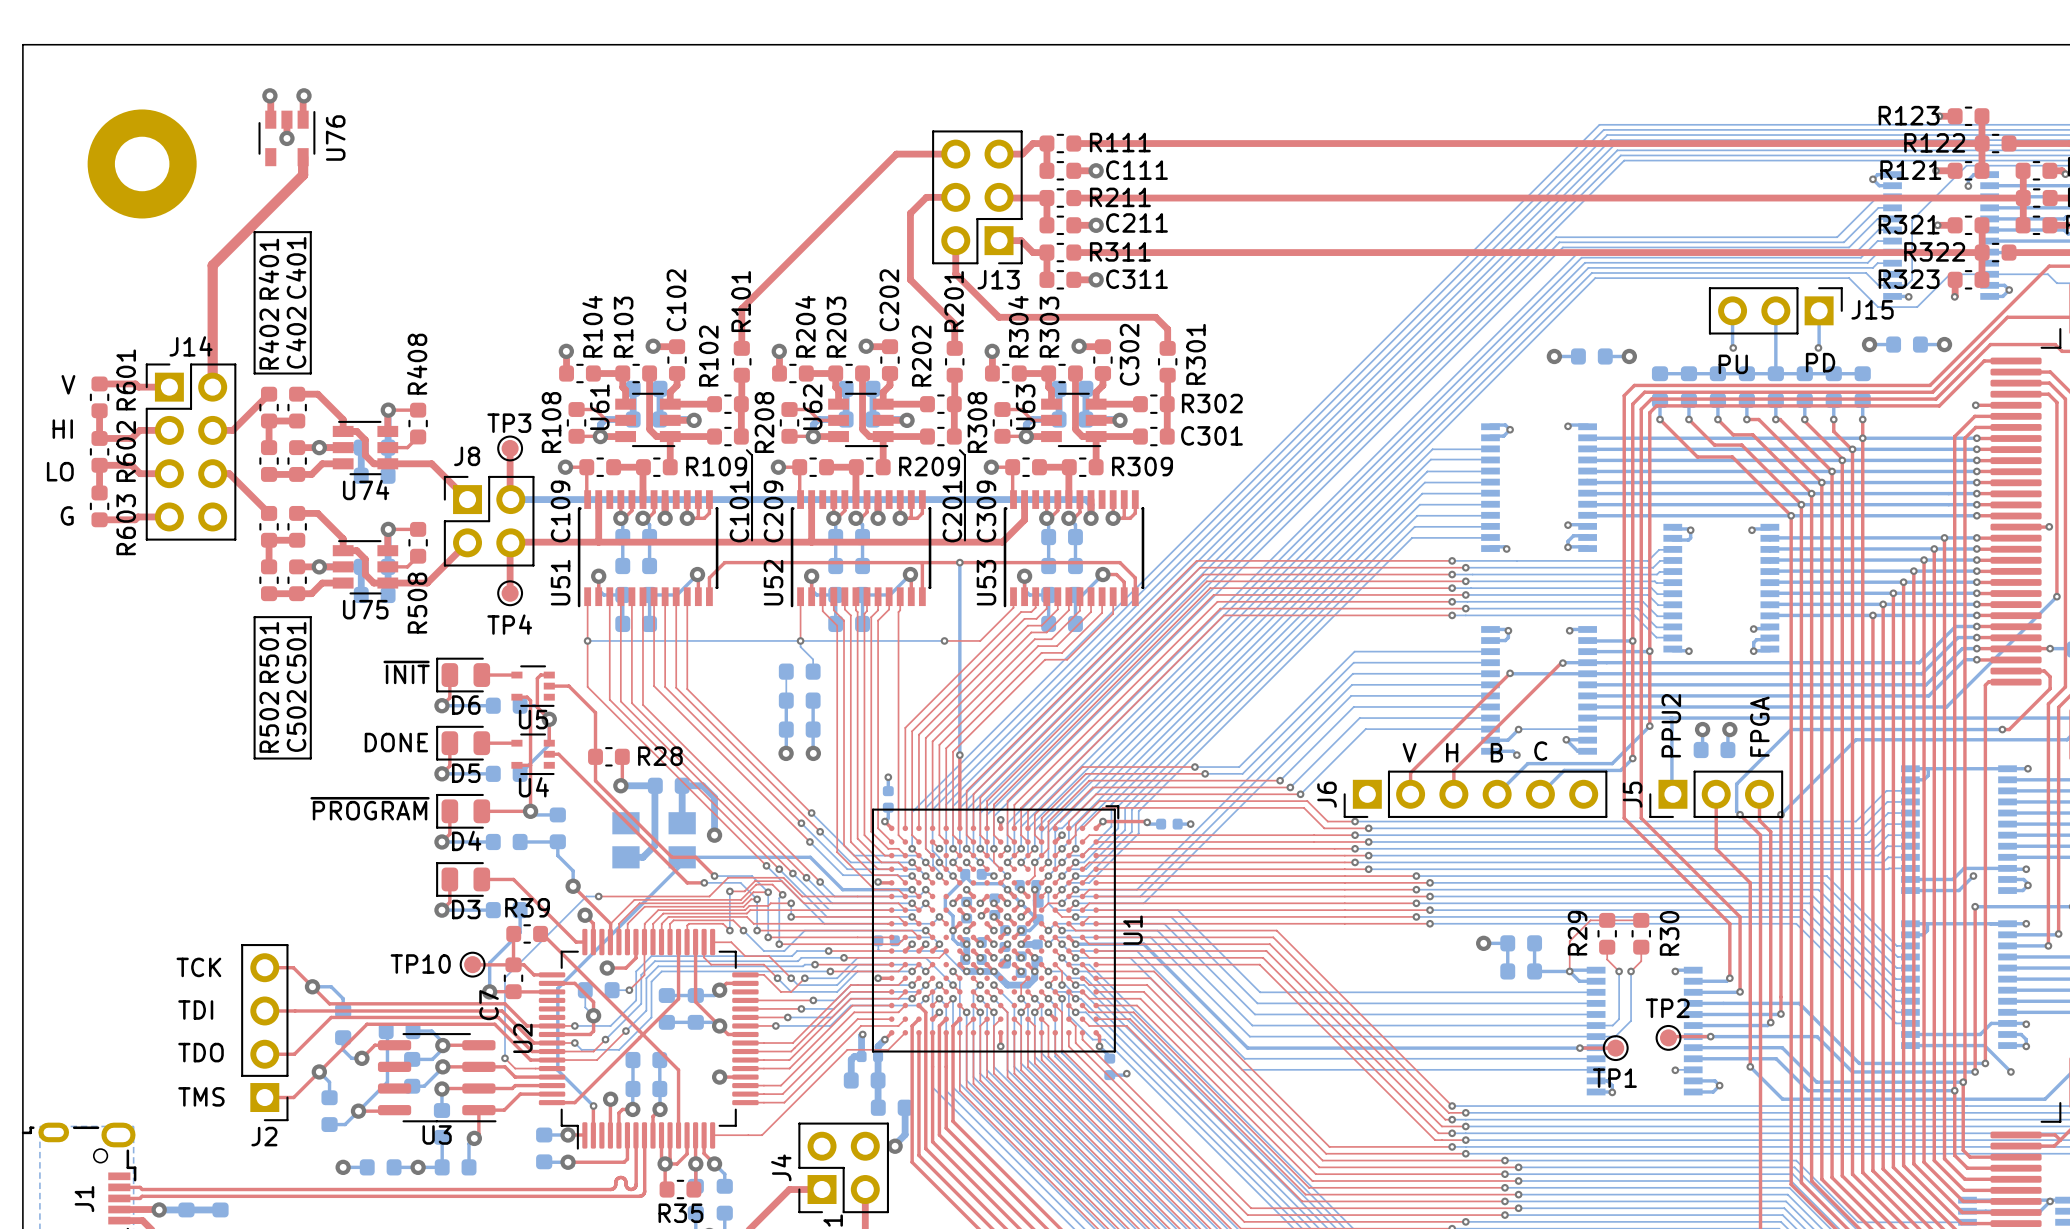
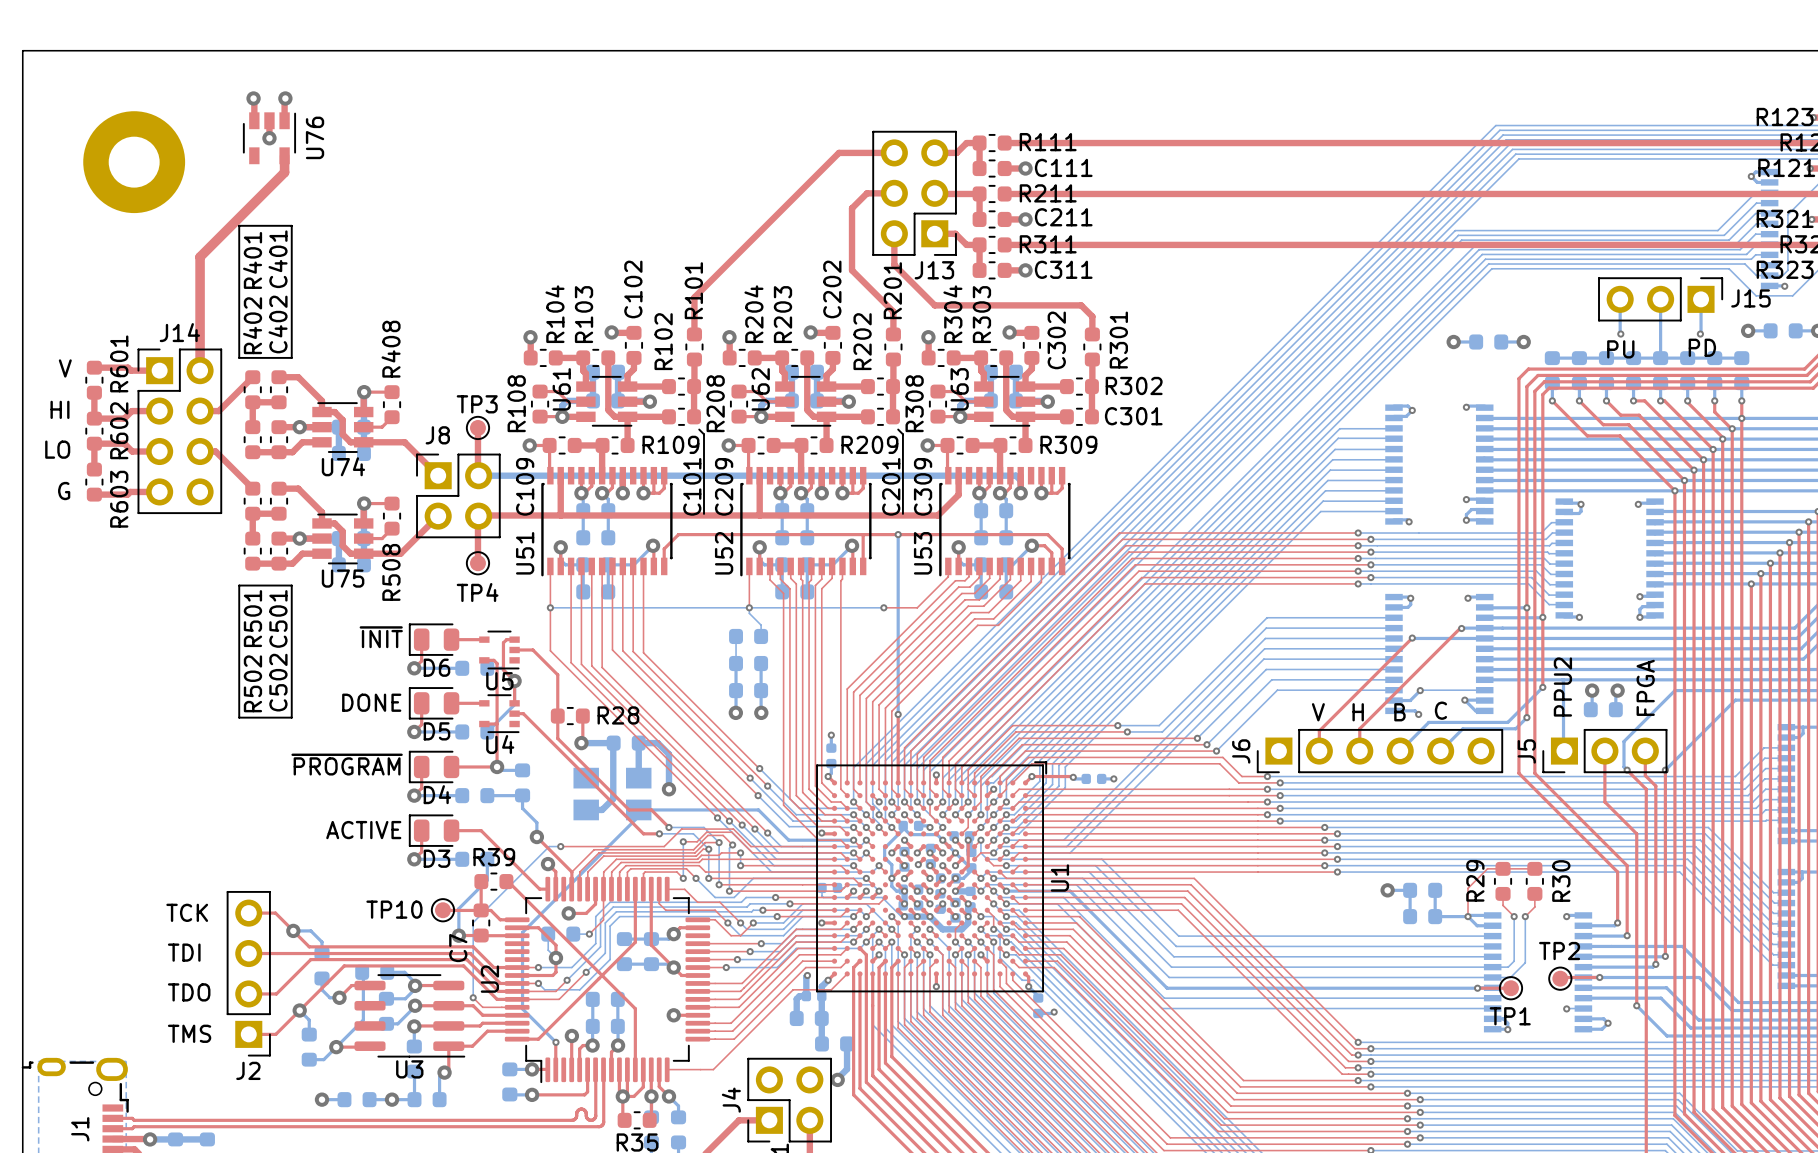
text: none -> ACTIVE (363, 830)

